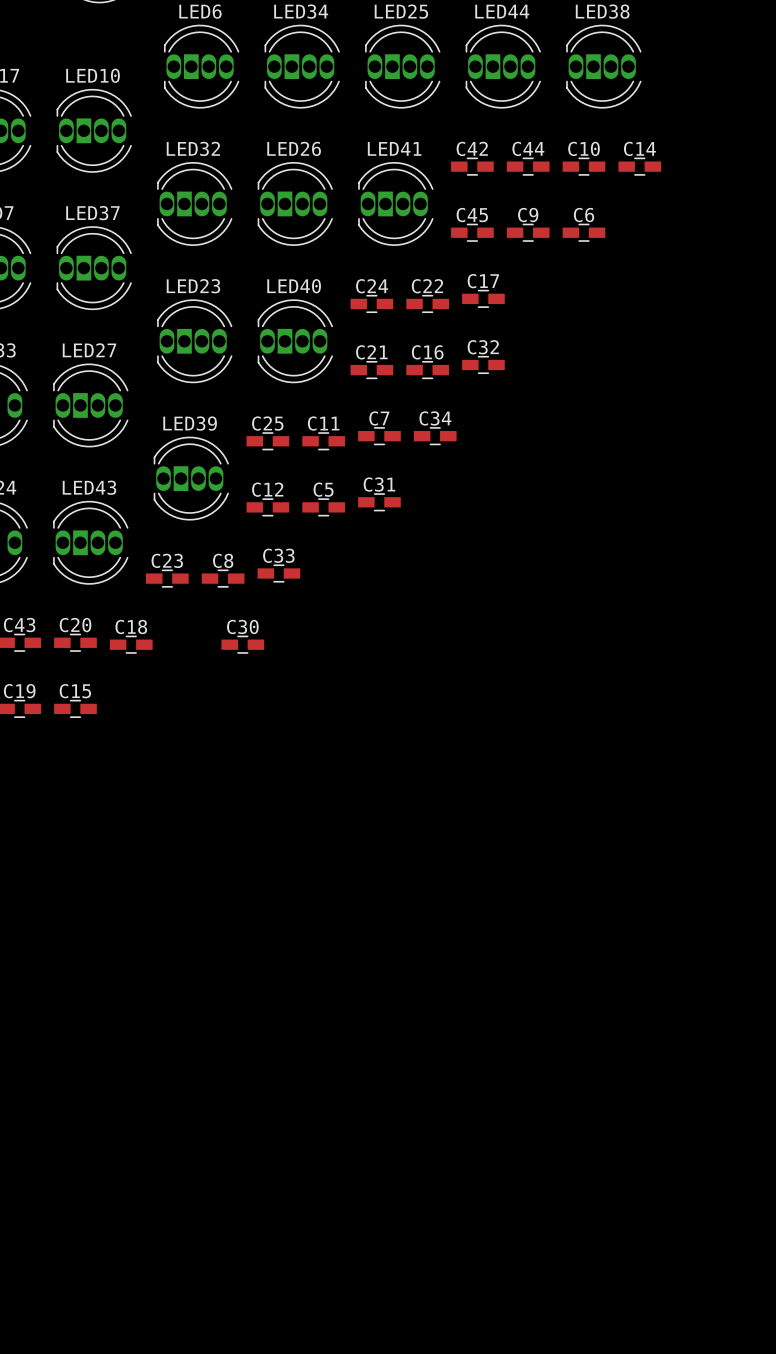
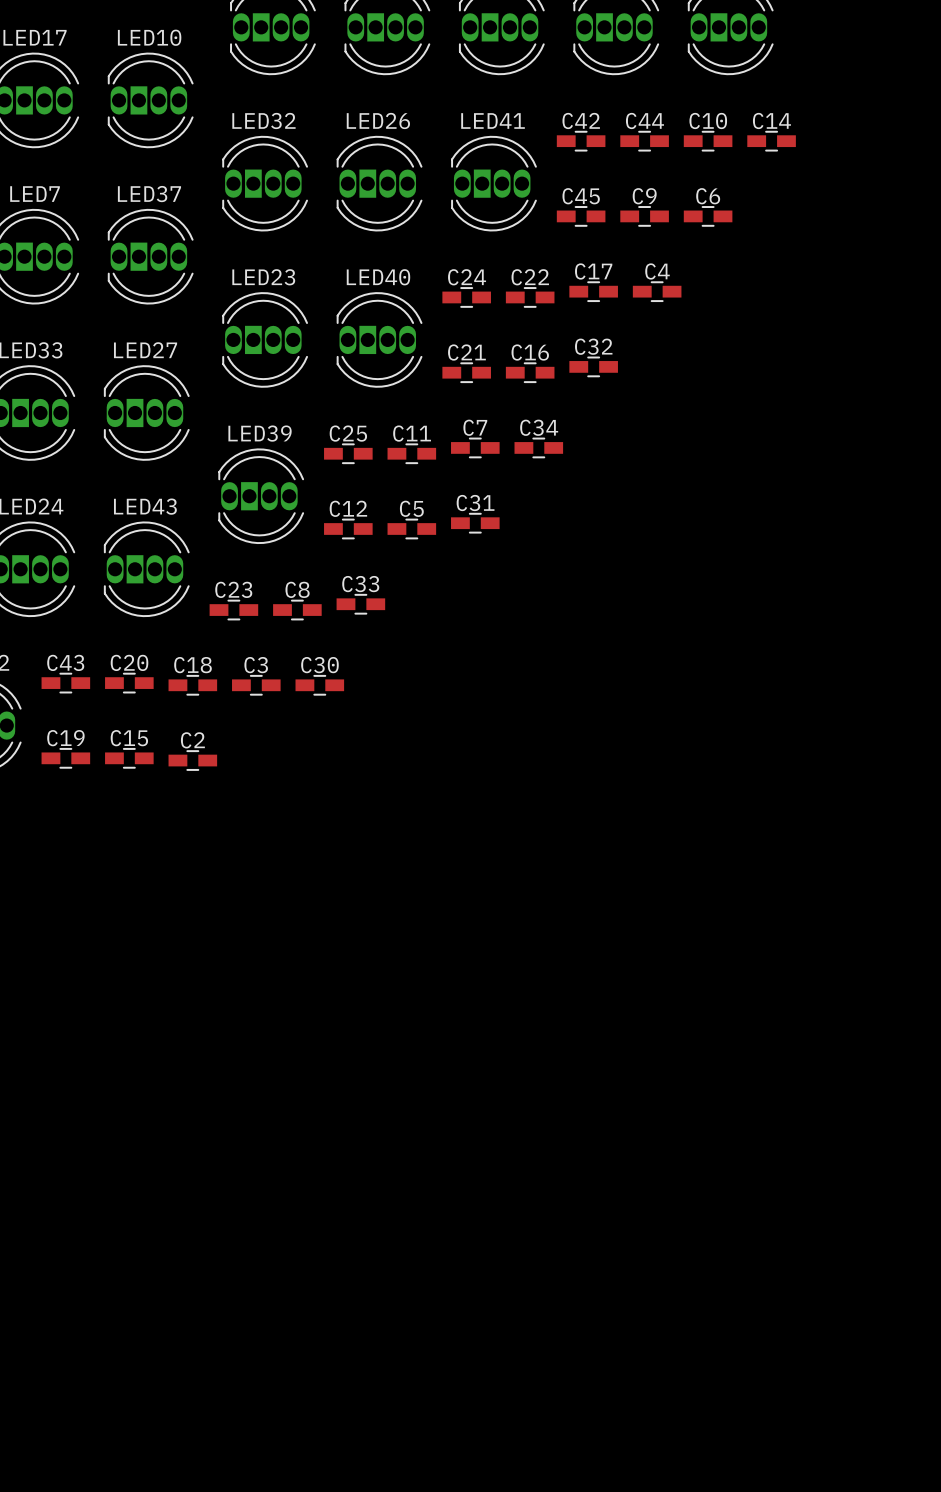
C4: none -> (657, 291)
C3: none -> (256, 685)
C2: none -> (192, 760)

